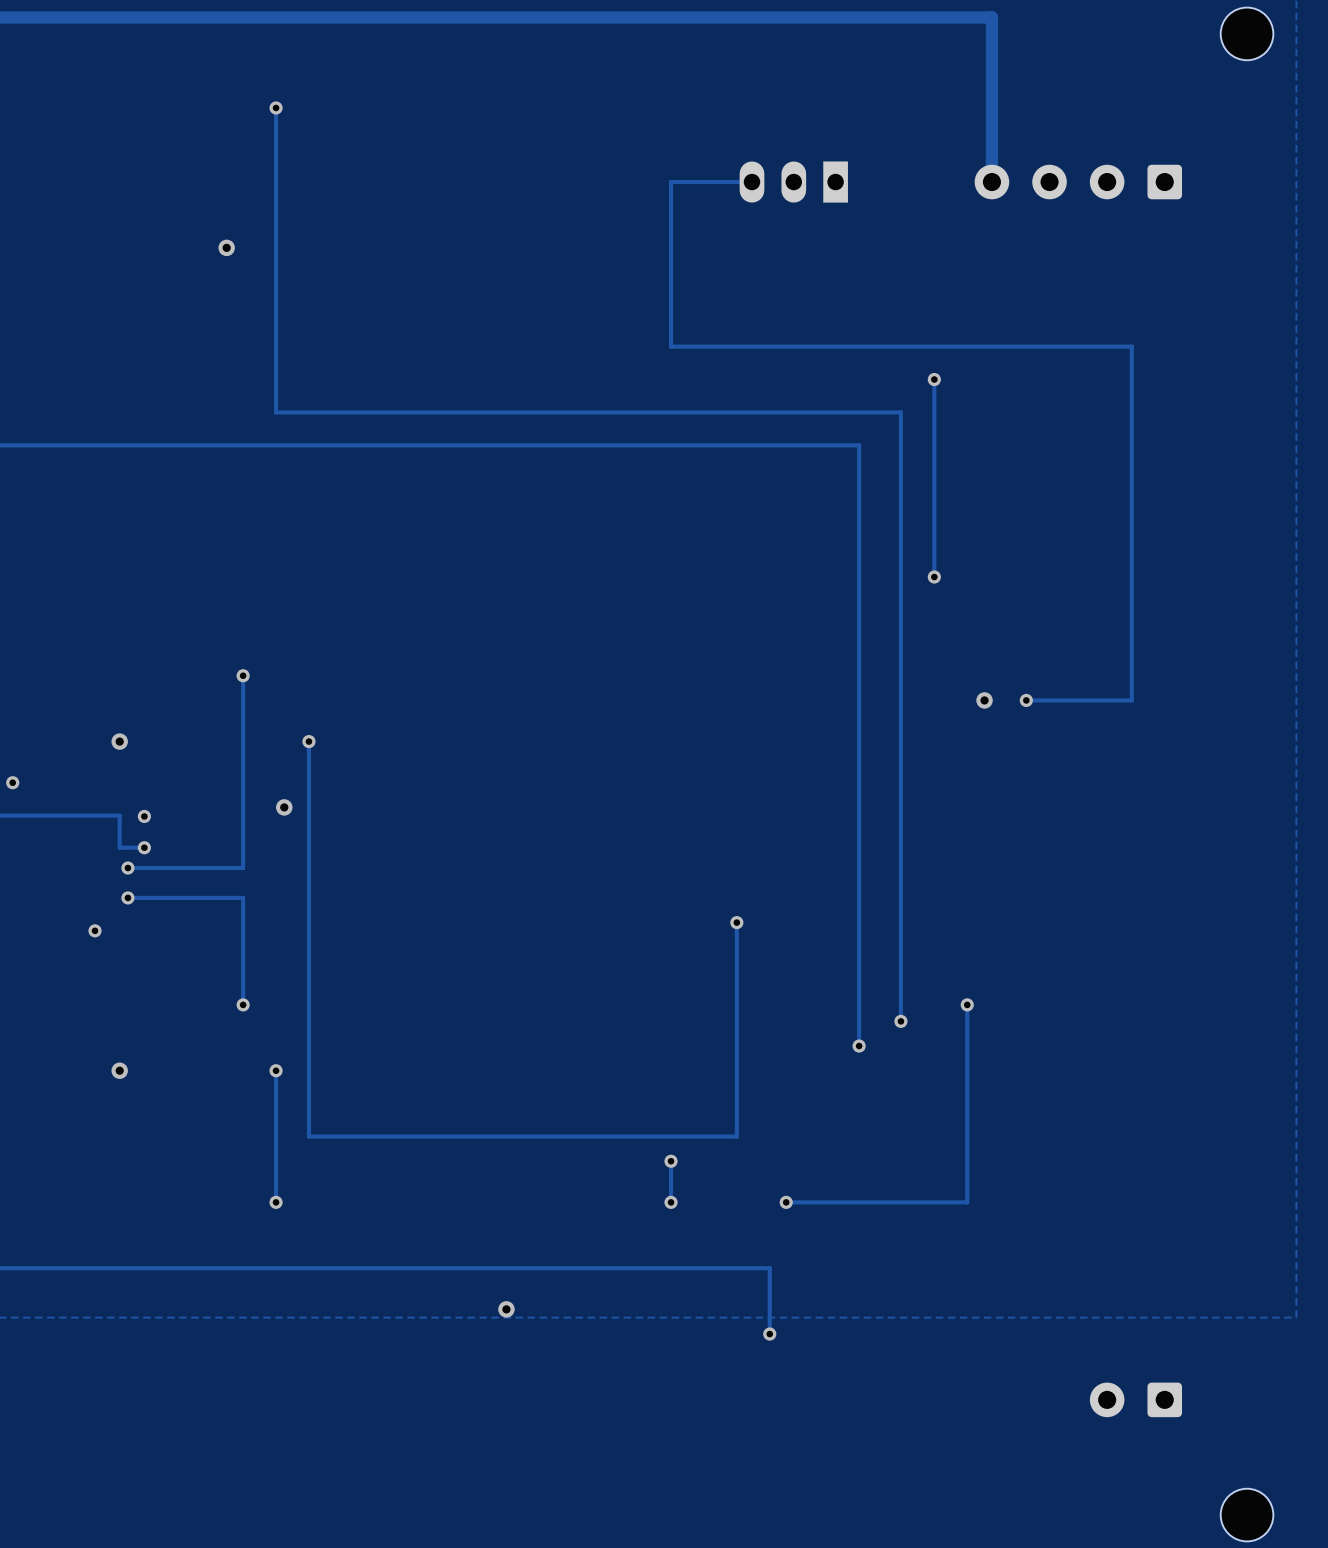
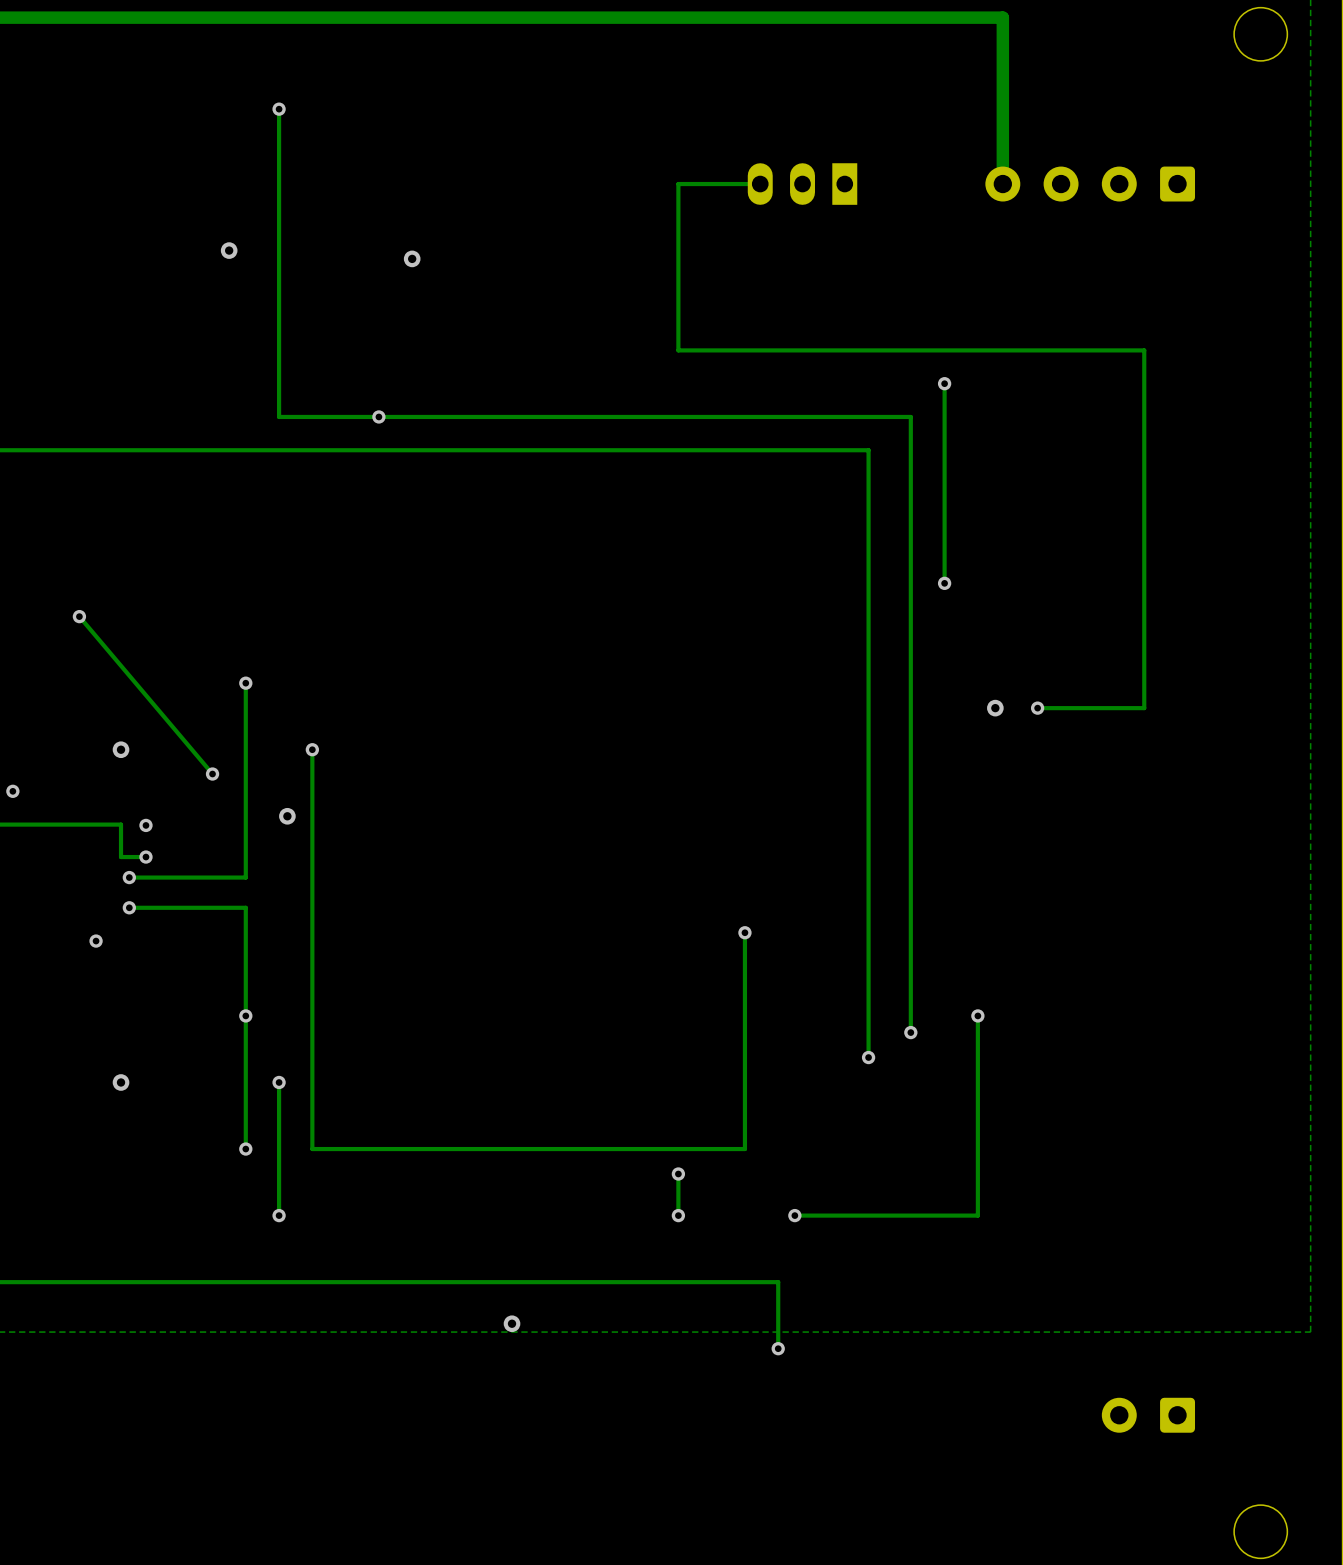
via: none -> (412, 258)
via: none -> (378, 416)
track: none -> (79, 616) (212, 774)
via: none -> (79, 616)
via: none -> (212, 774)
track: none -> (245, 1015) (245, 1149)
via: none -> (245, 1149)

